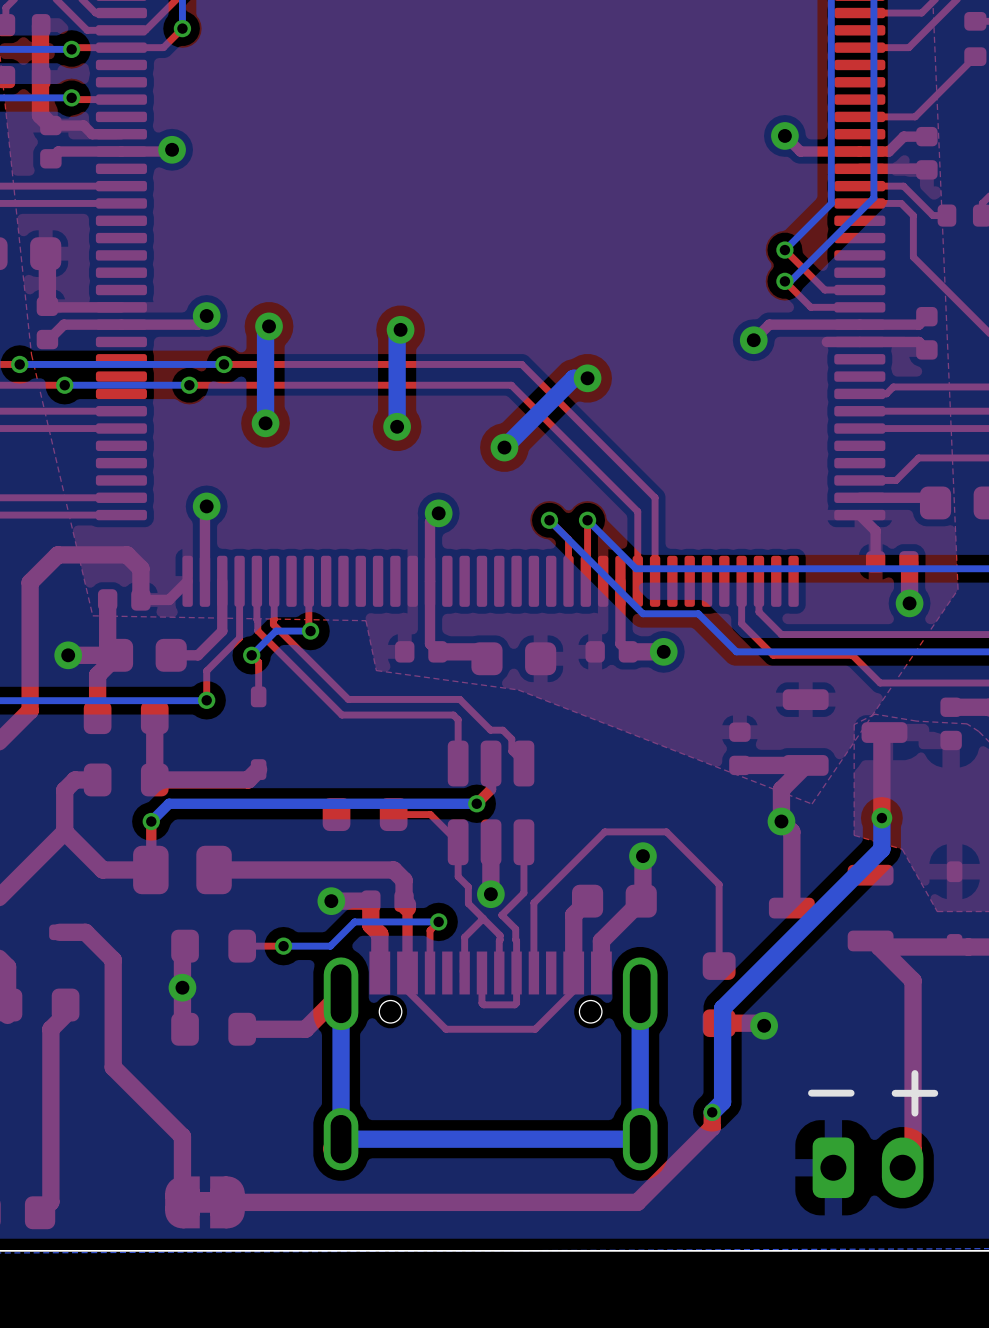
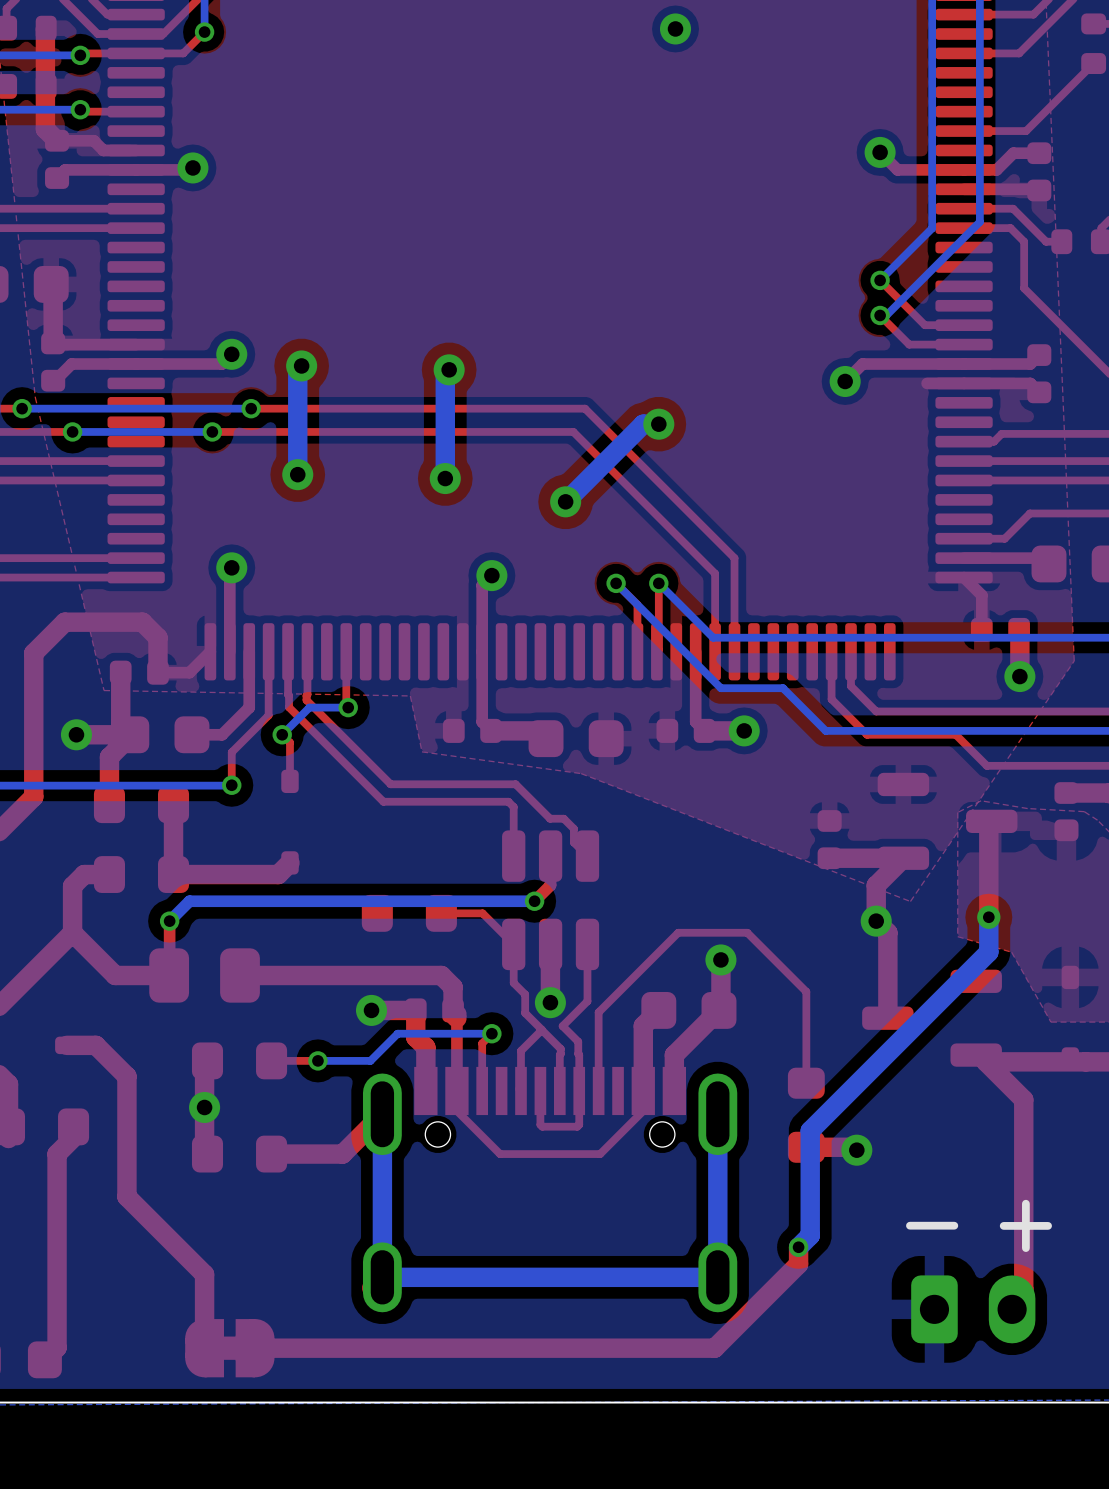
via: none -> (675, 28)

